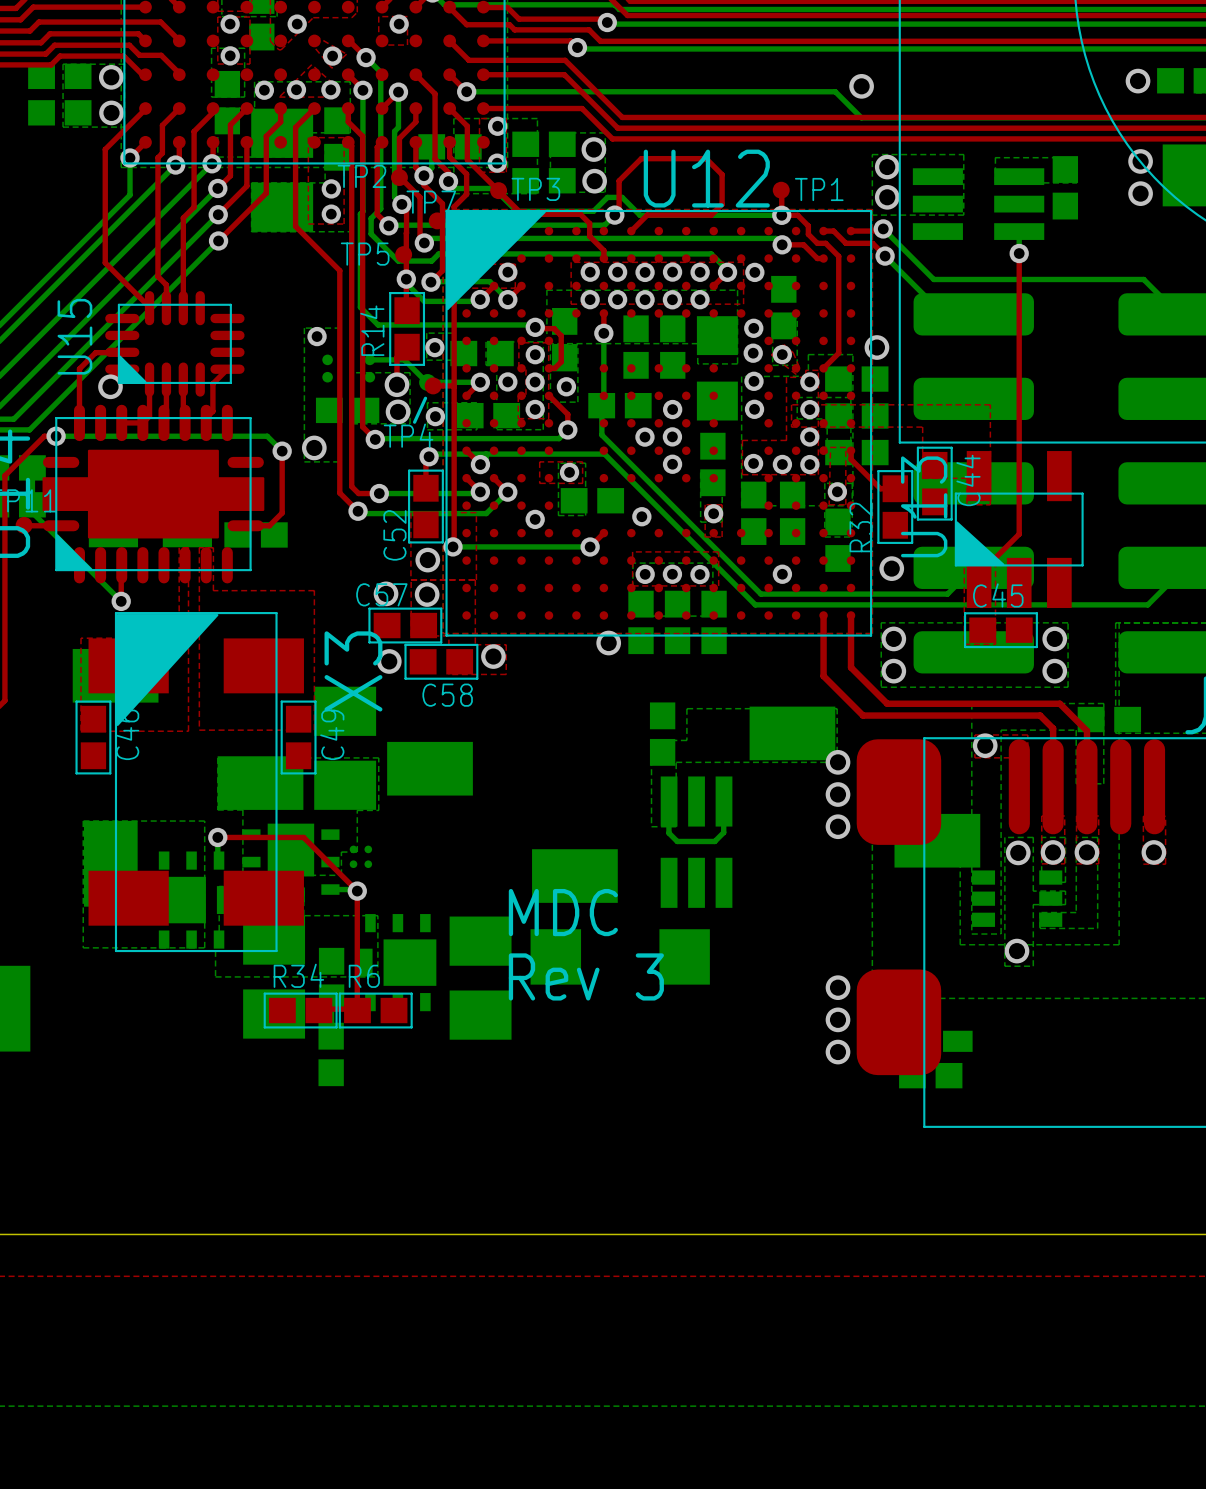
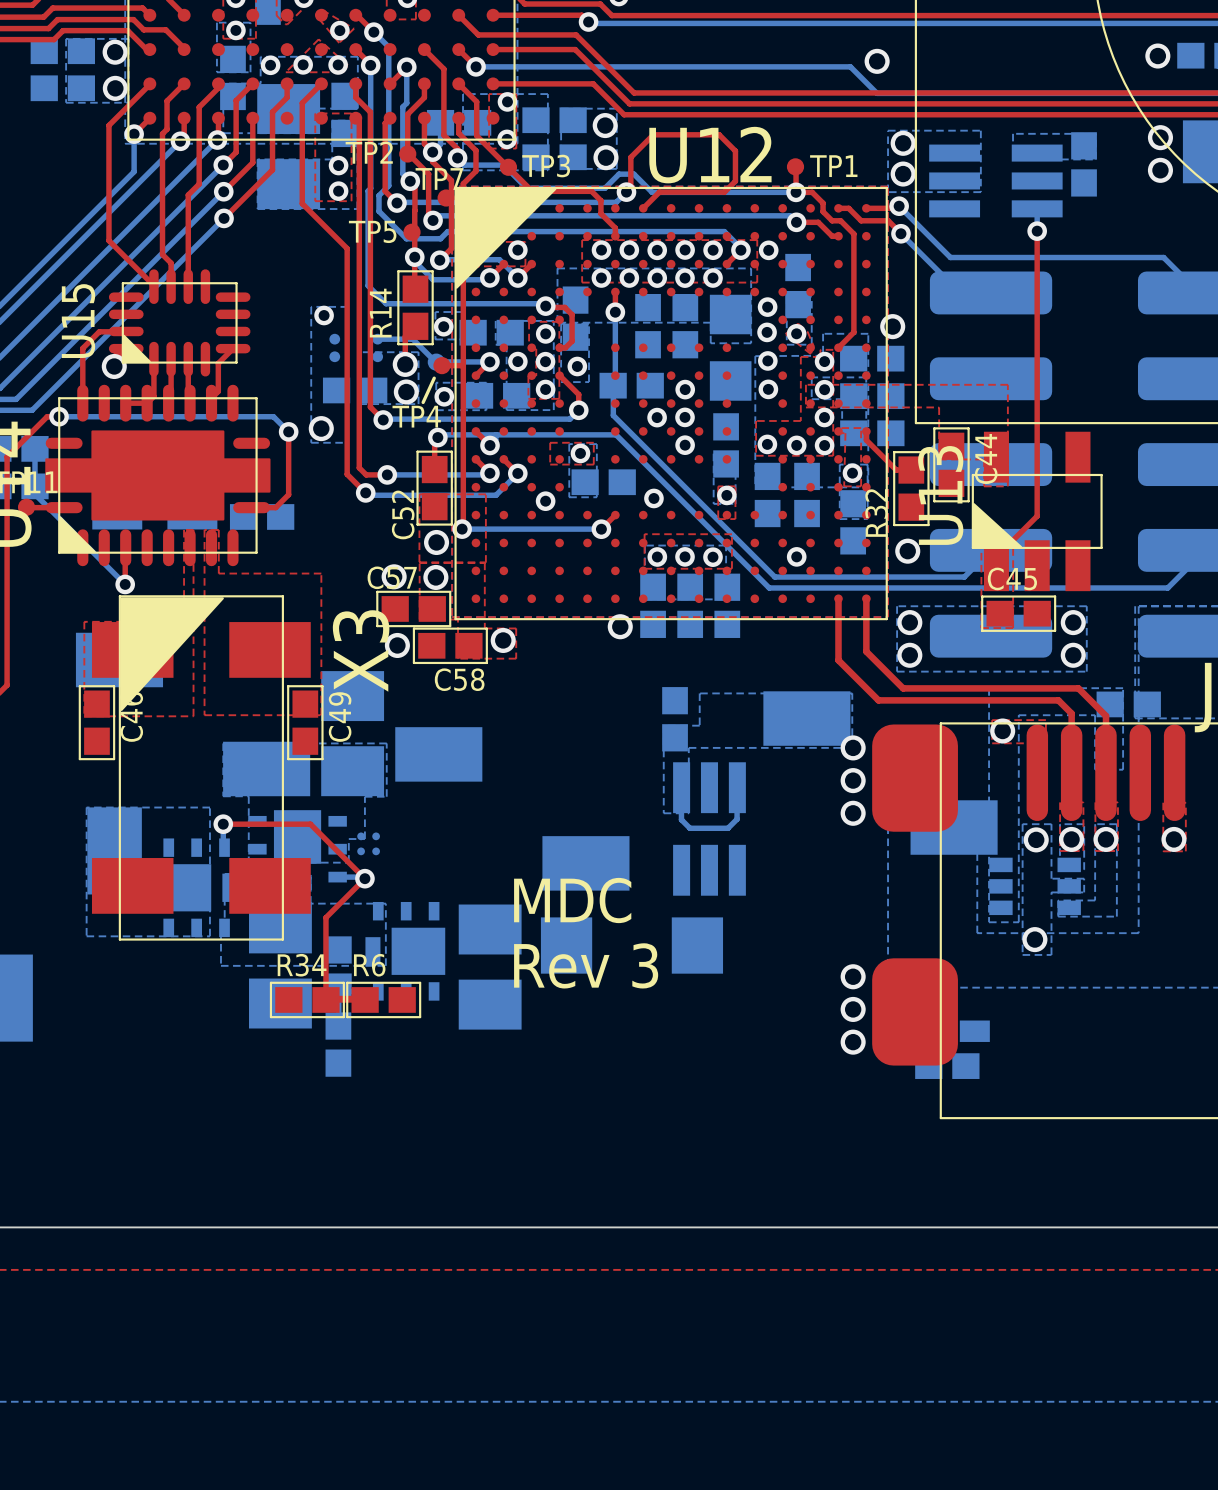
top track: (357, 891) (357, 1010) -> (364, 878) (325, 917) (325, 999) (365, 999)

